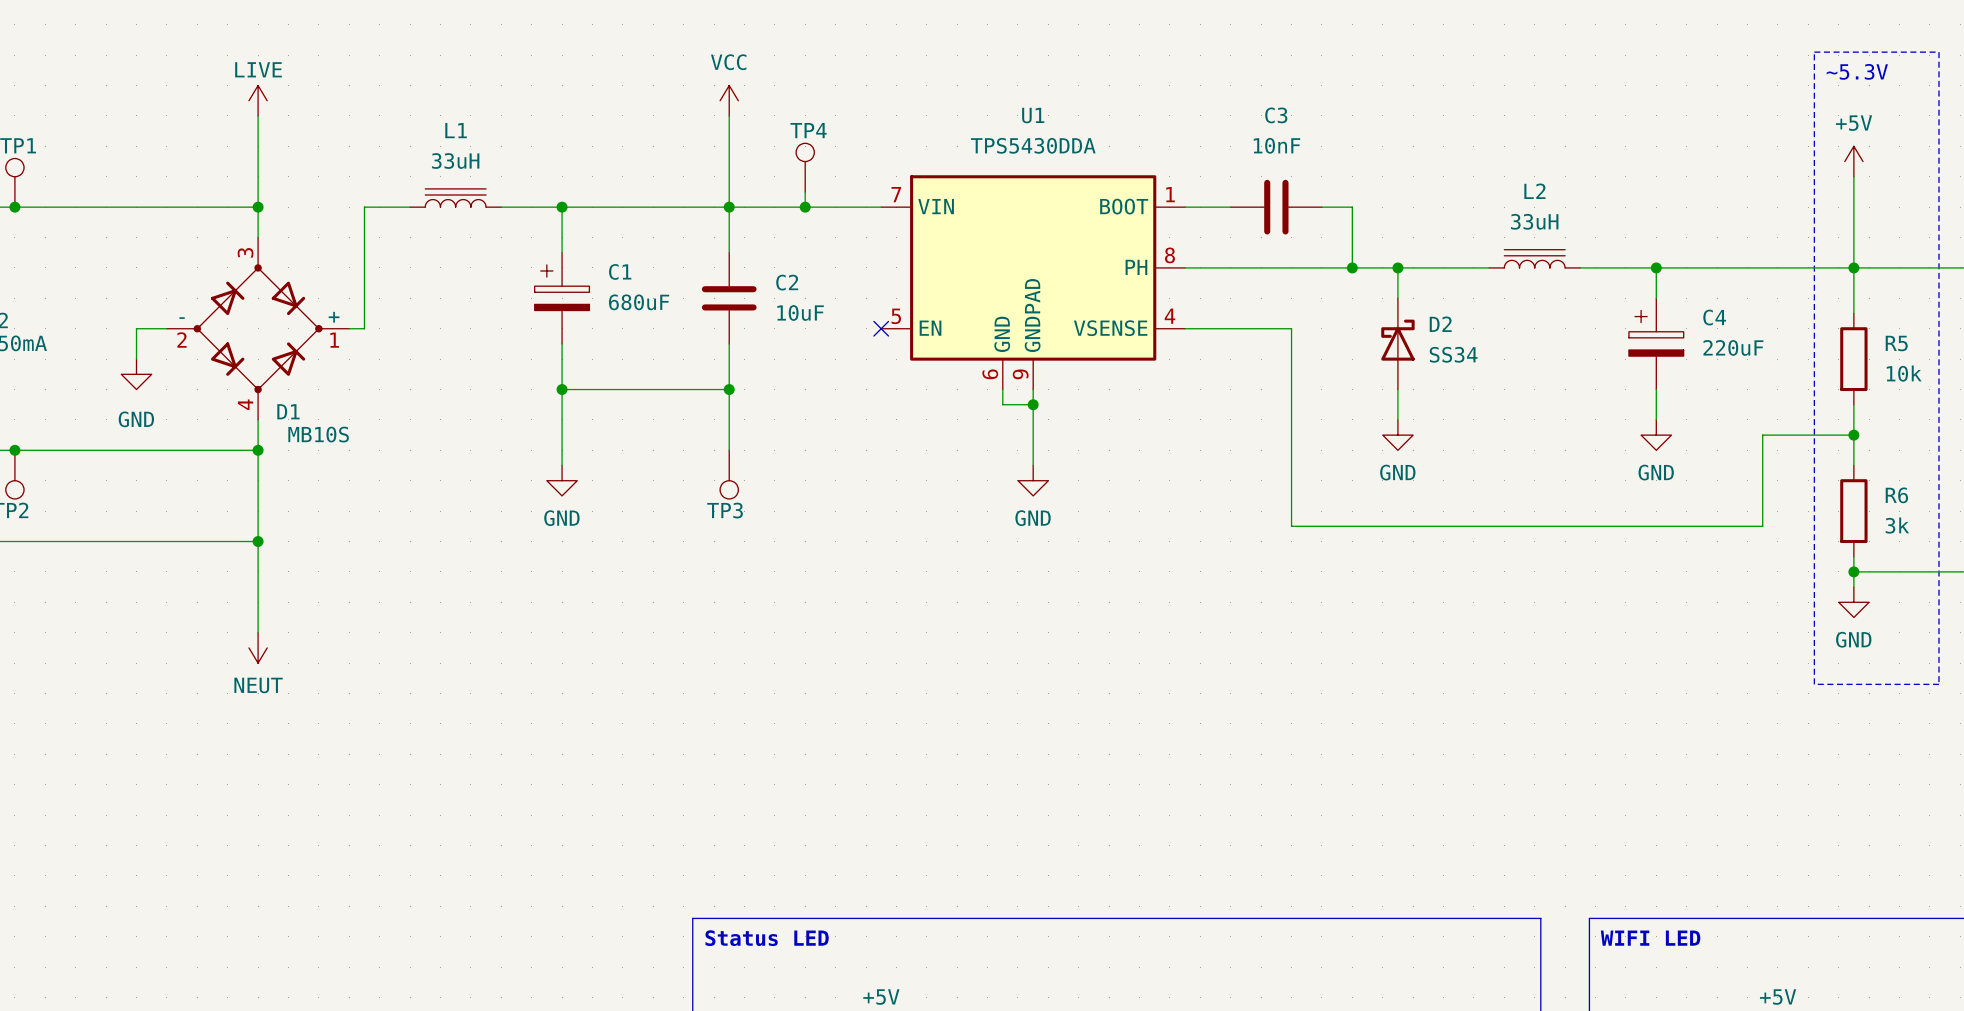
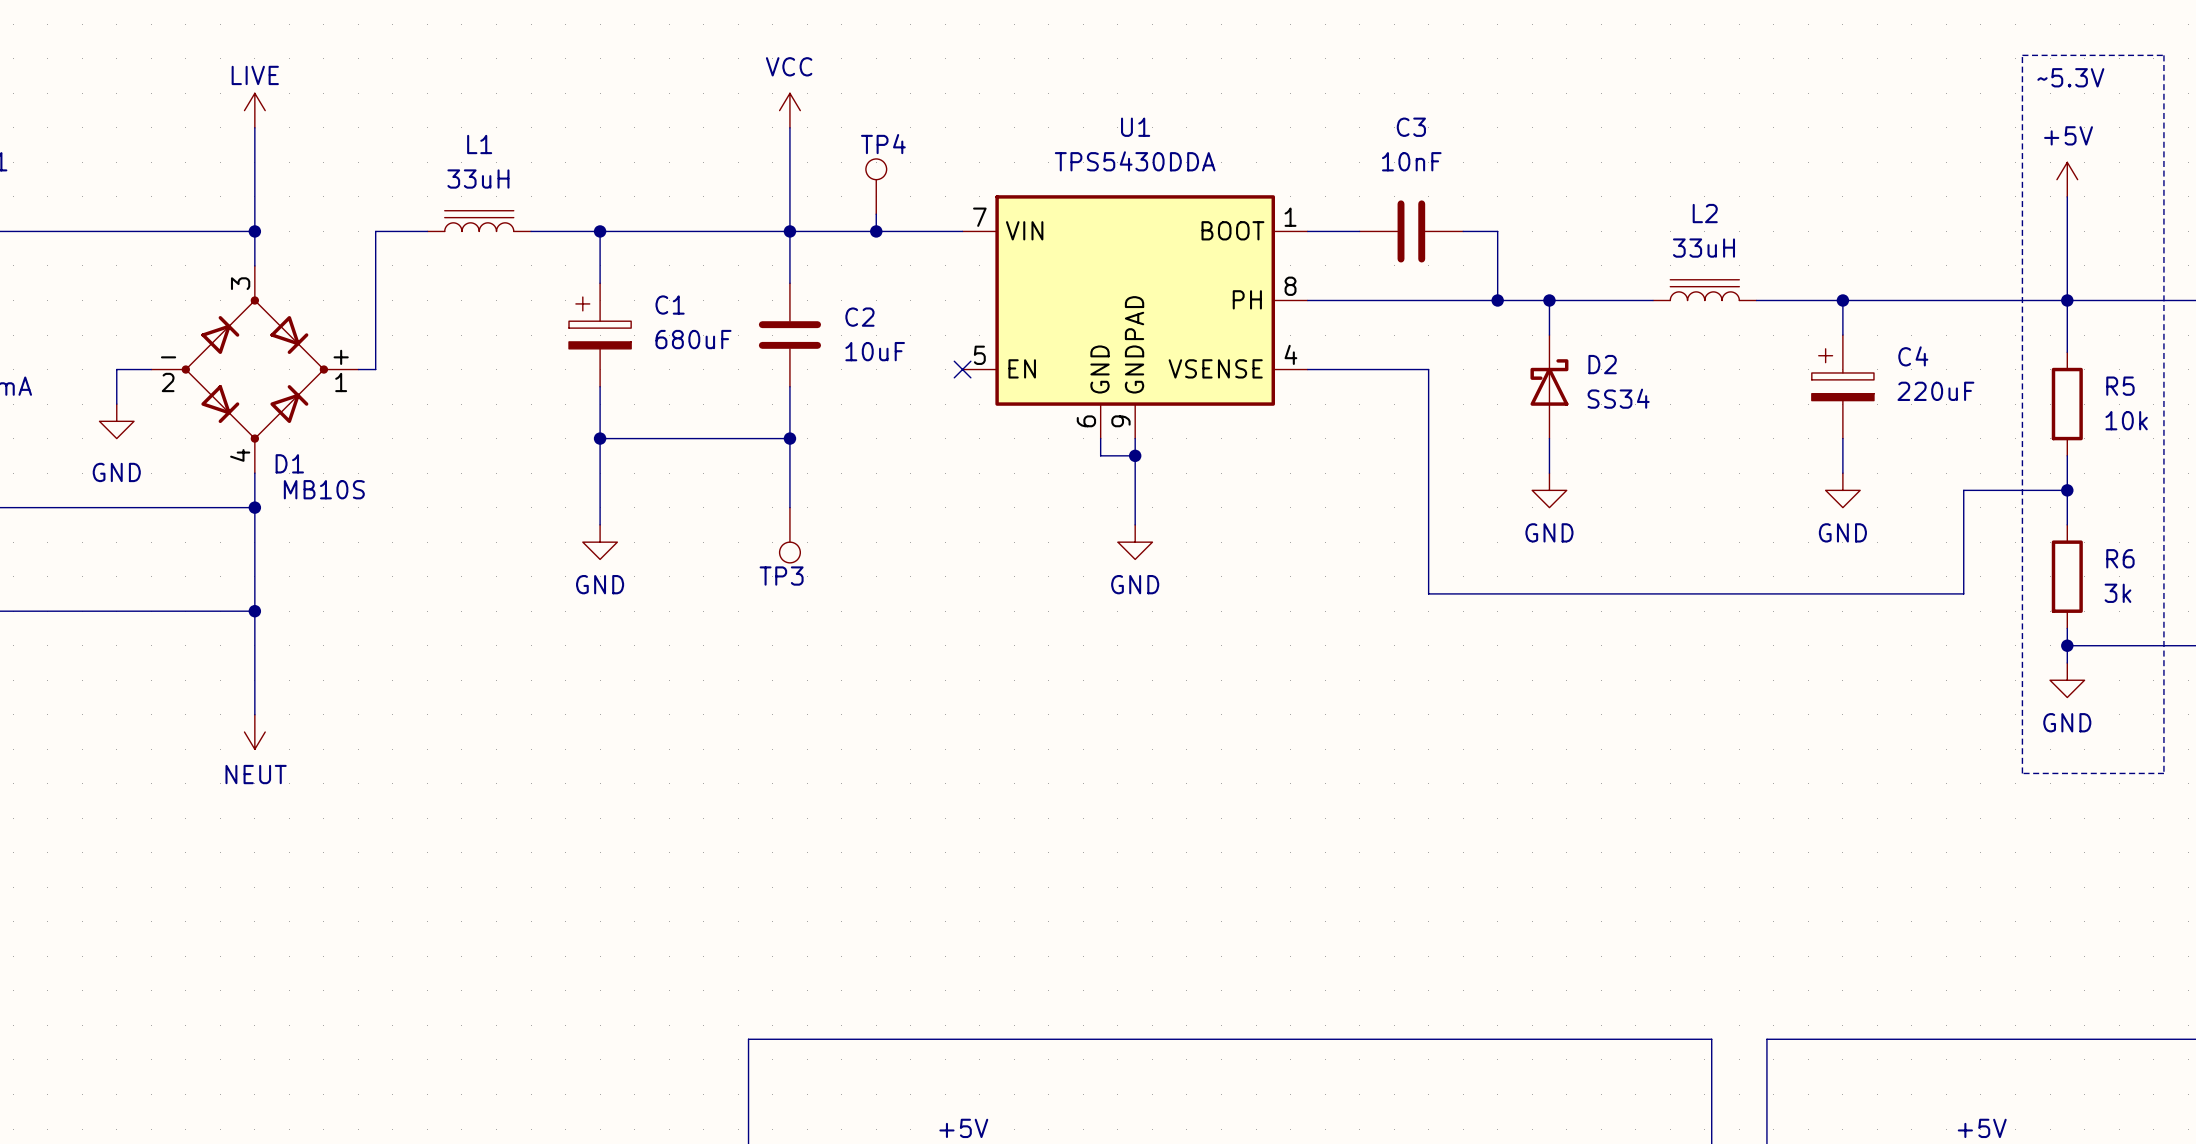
text: Status LED (767, 938) -> none
text: WIFI LED (1650, 938) -> none

